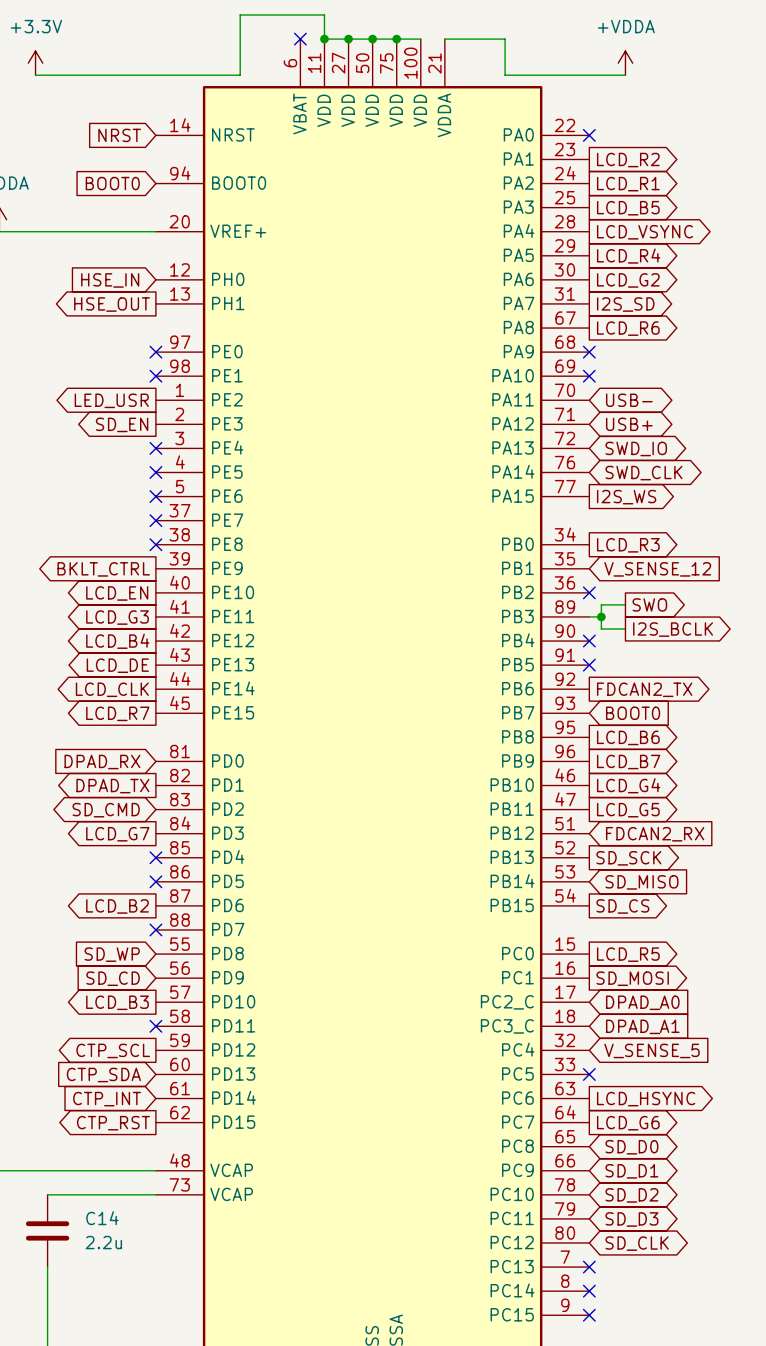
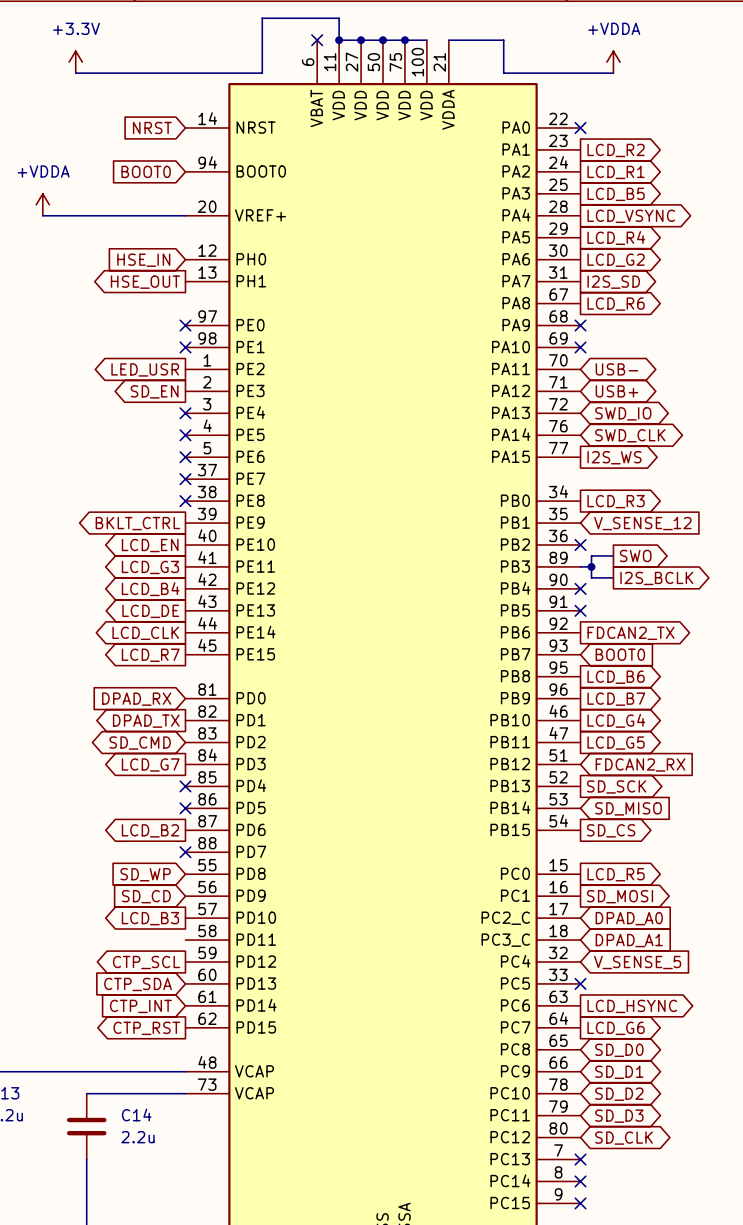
no-connect mark: (155, 1026) -> none

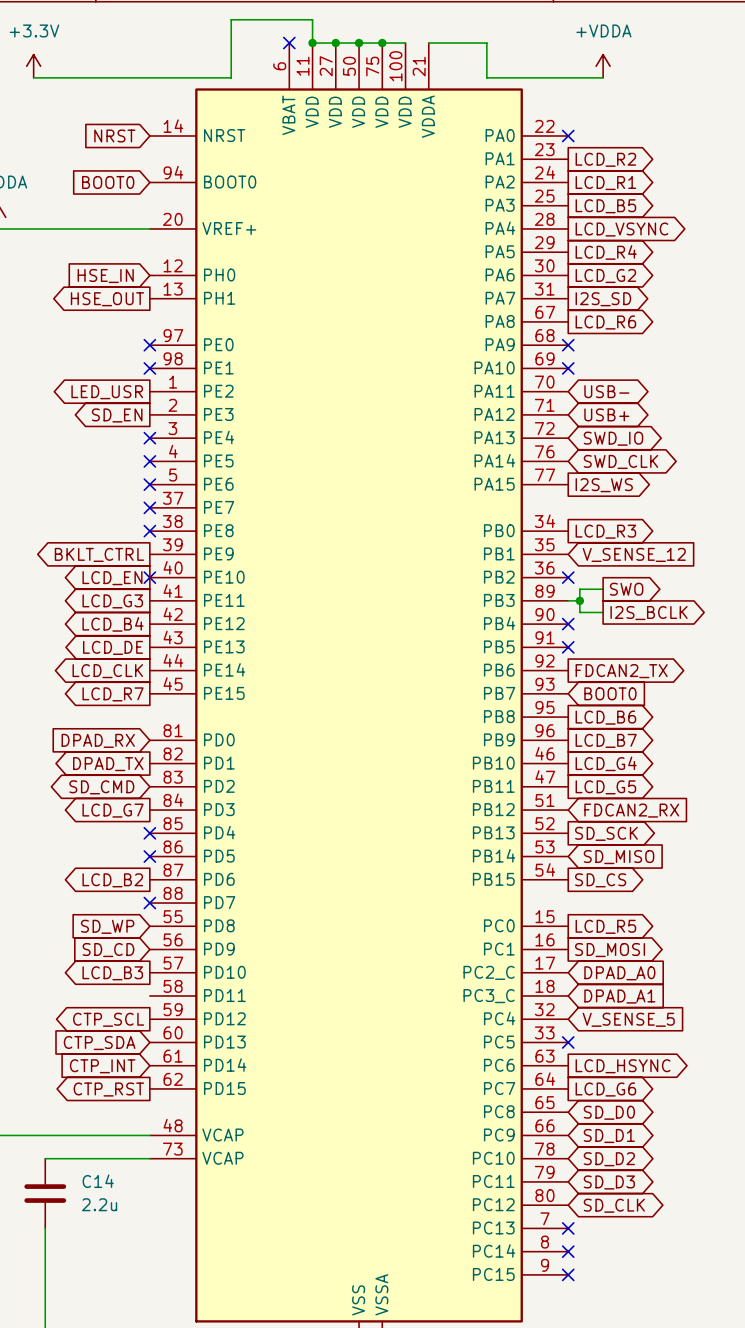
no-connect mark: none -> (149, 577)

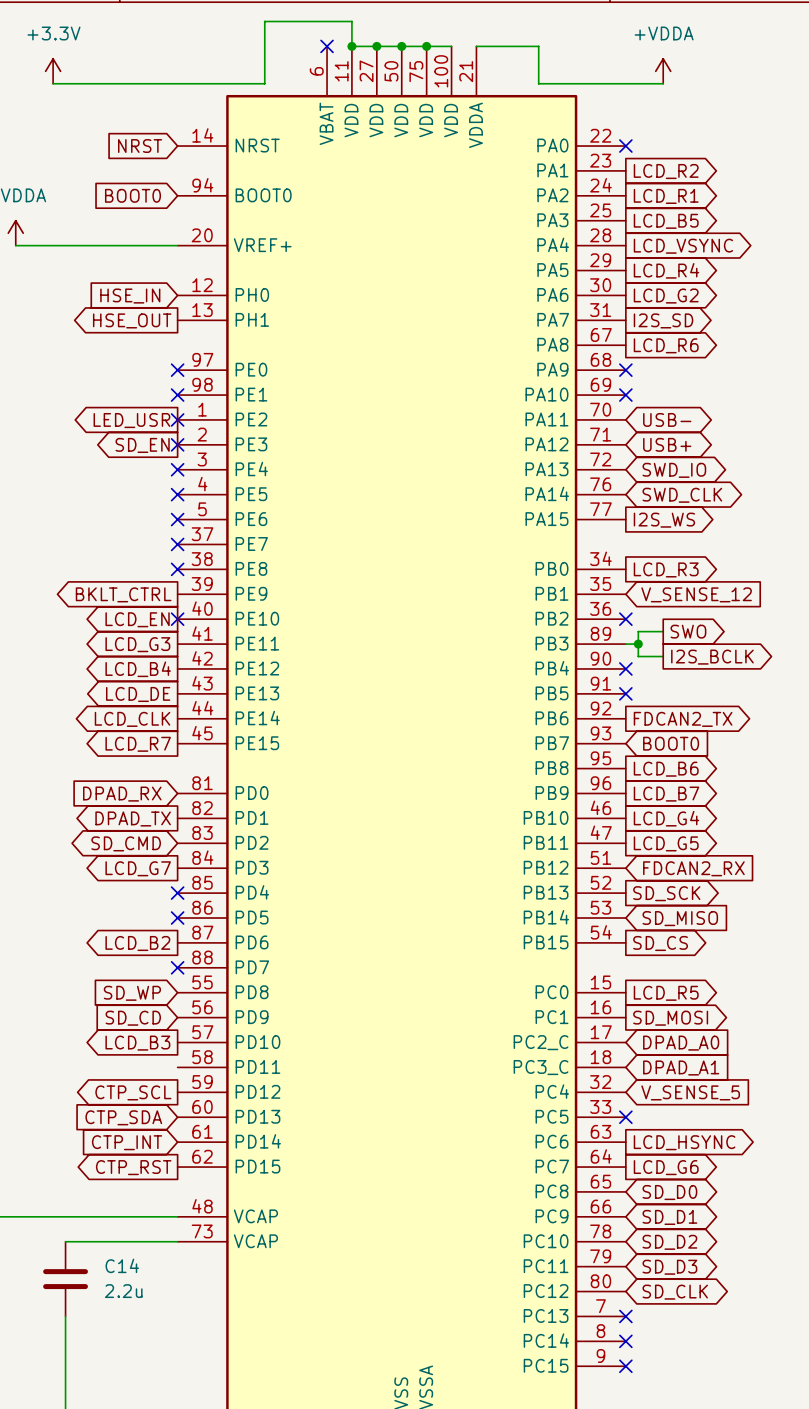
no-connect mark: none -> (177, 419)
no-connect mark: none -> (177, 444)

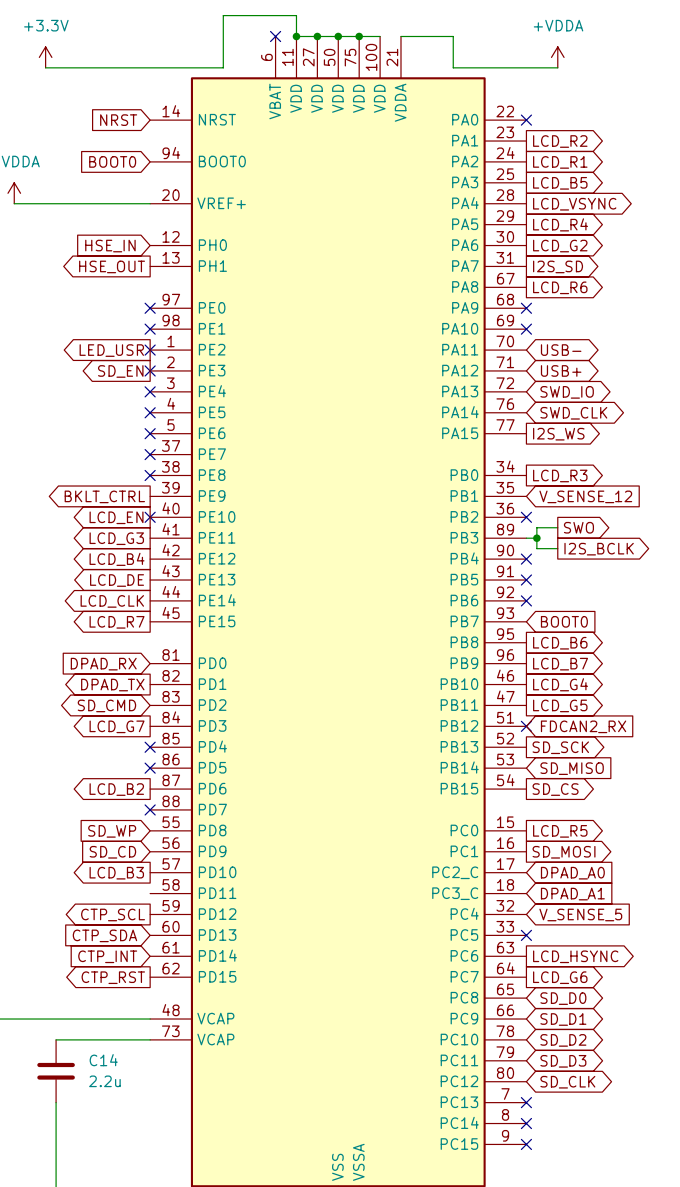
no-connect mark: none -> (526, 600)
global label: FDCAN2_TX (683, 719) -> none
no-connect mark: none -> (526, 726)

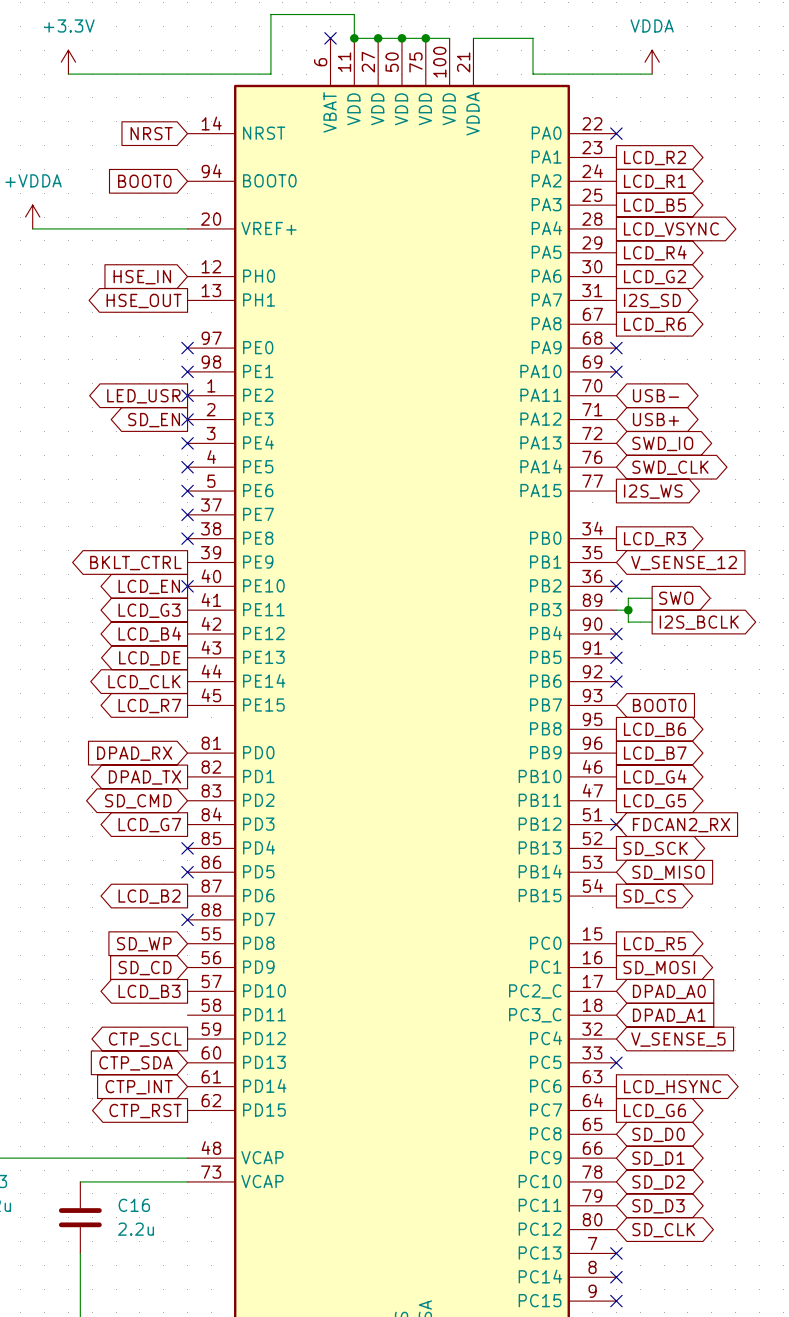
power symbol: +VDDA (557, 57) -> VDDA (652, 62)
C14 name: C14 (103, 1060) -> C16 (134, 1205)

